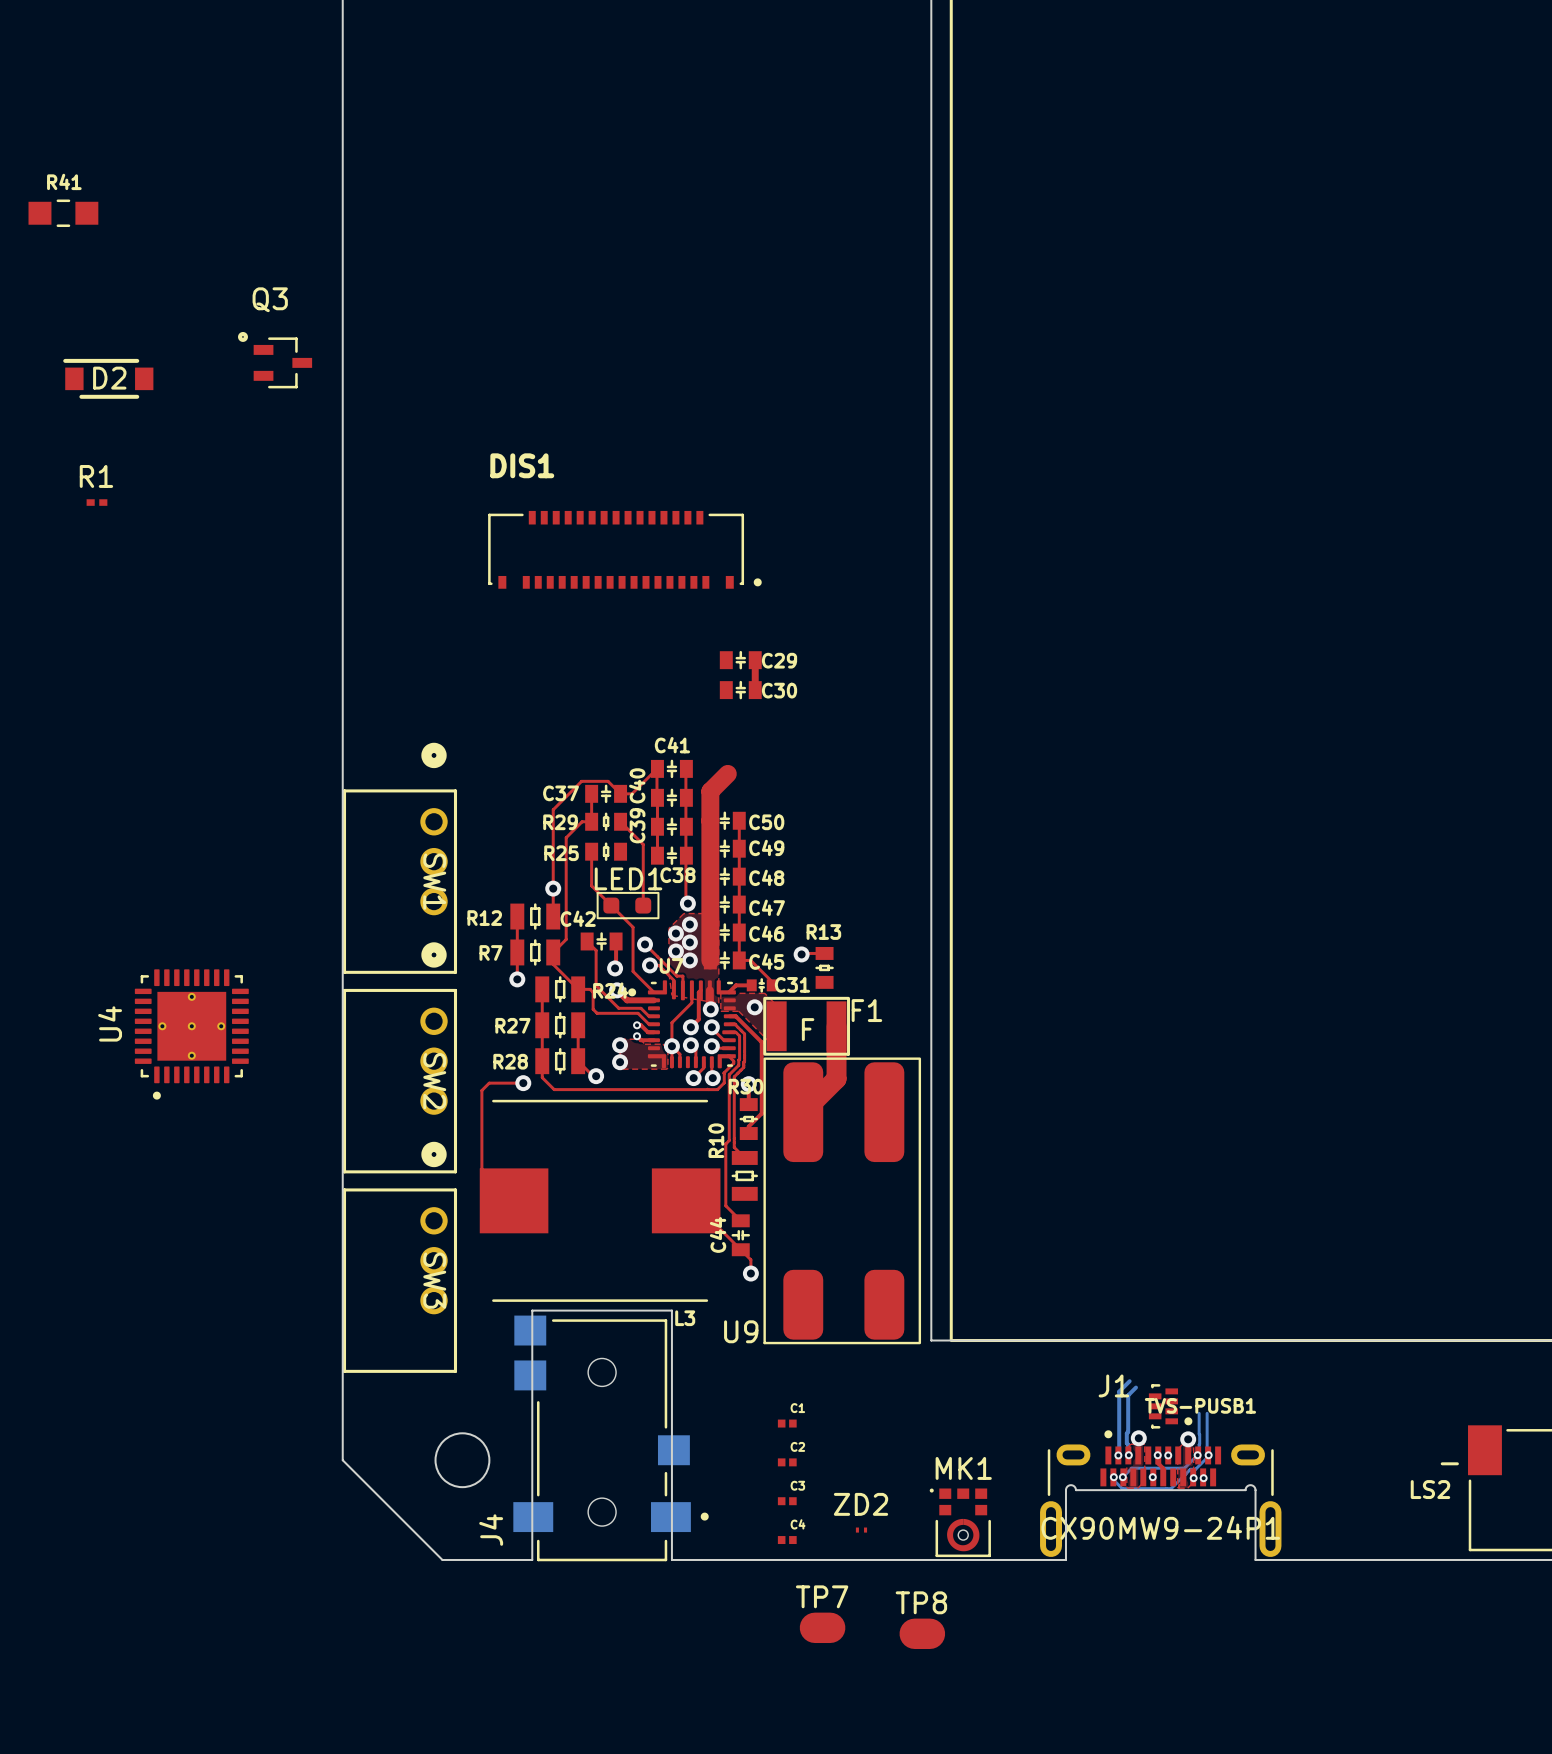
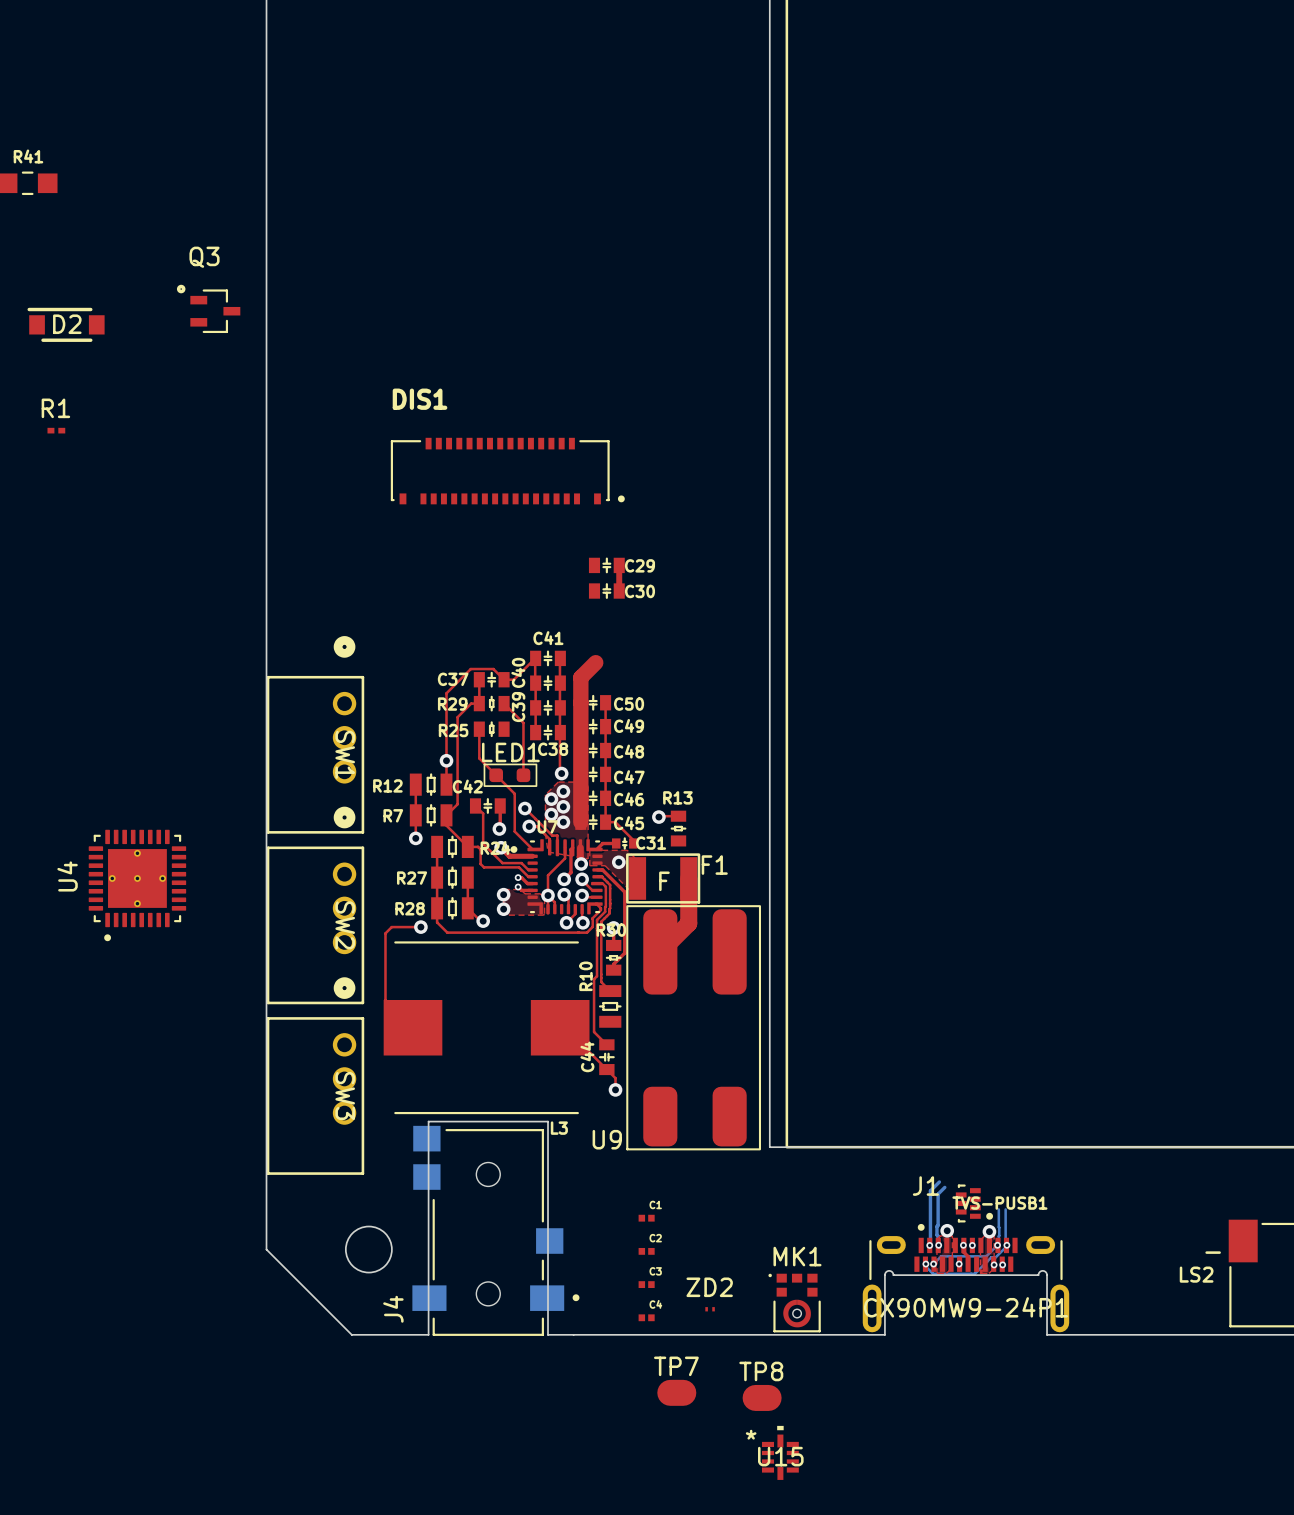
U15: none -> (780, 1452)

